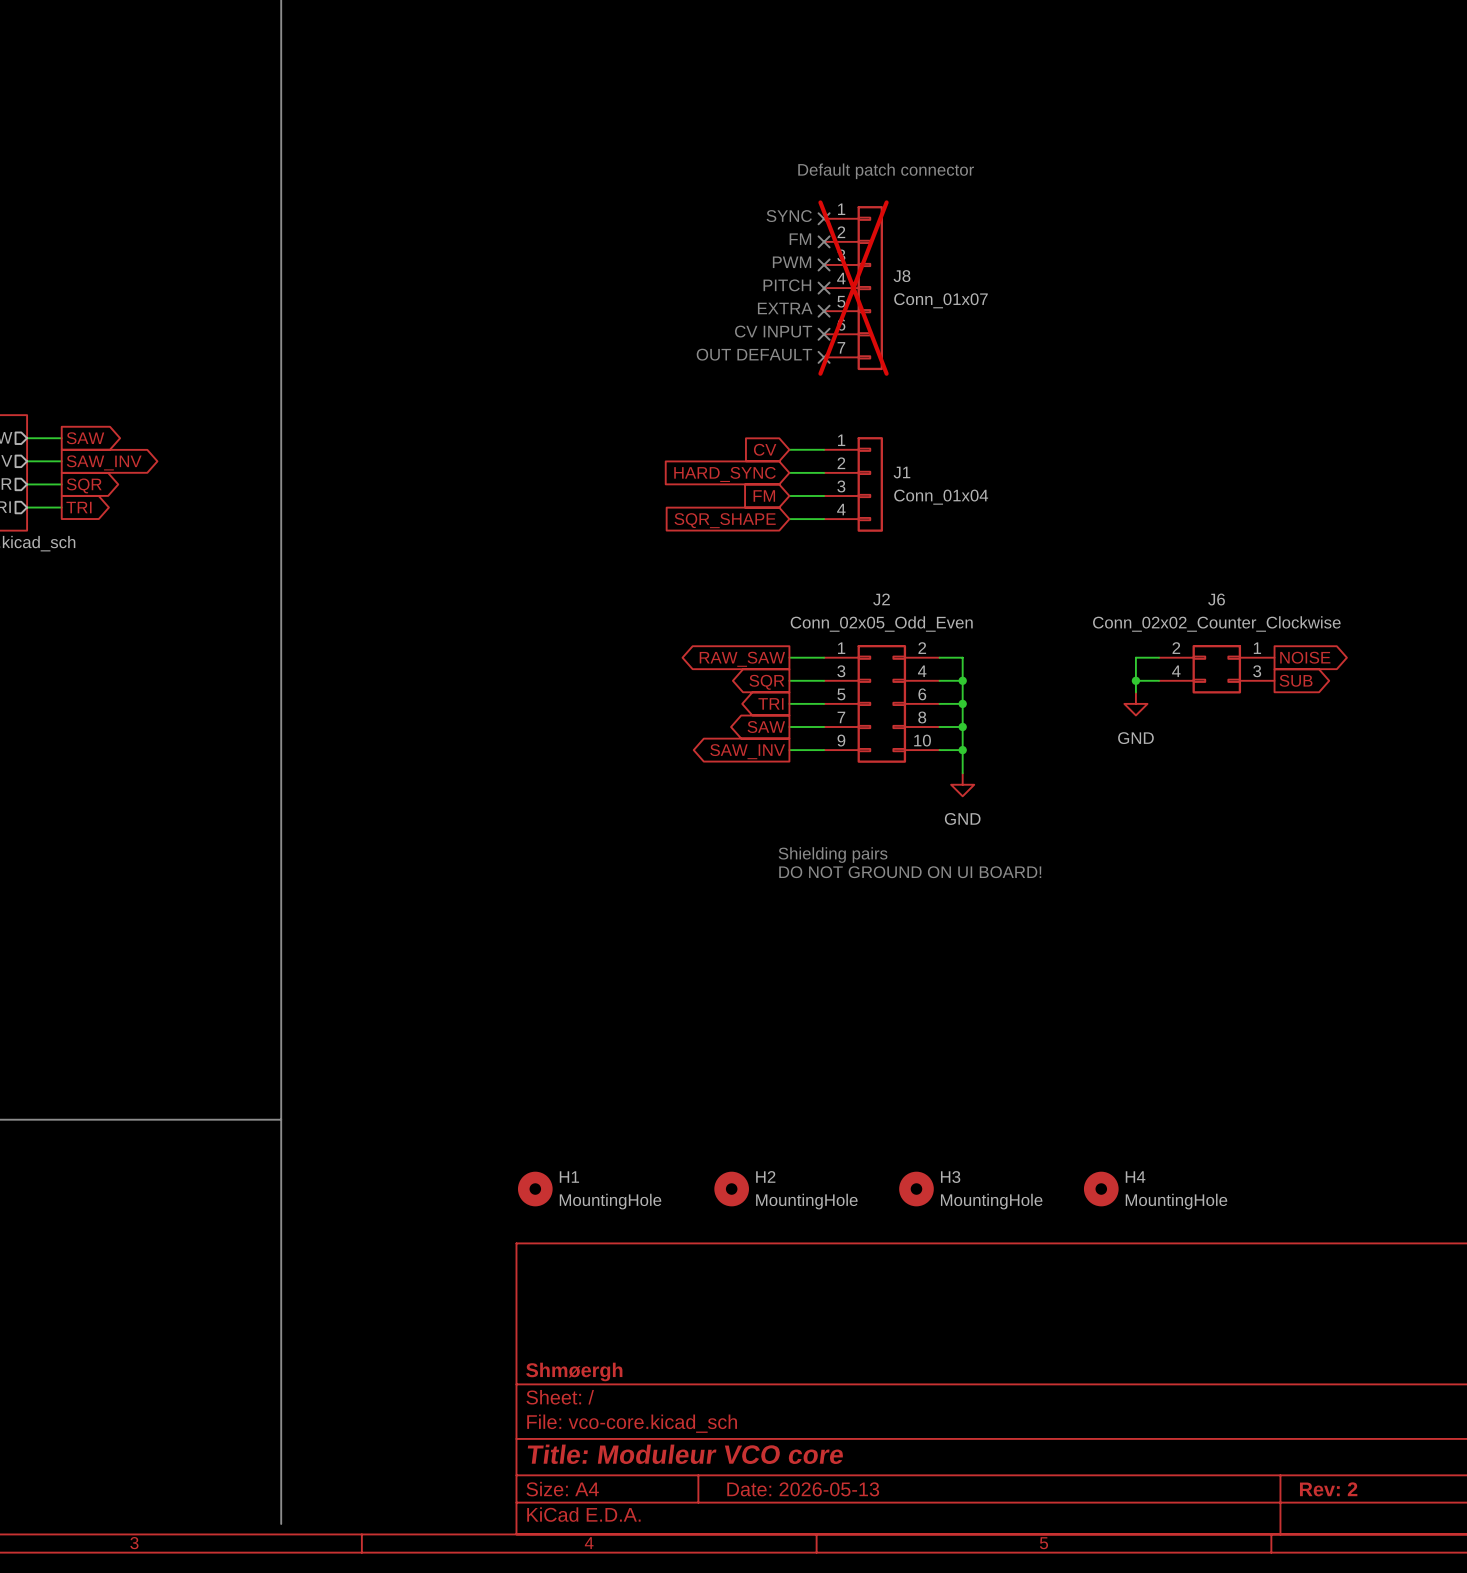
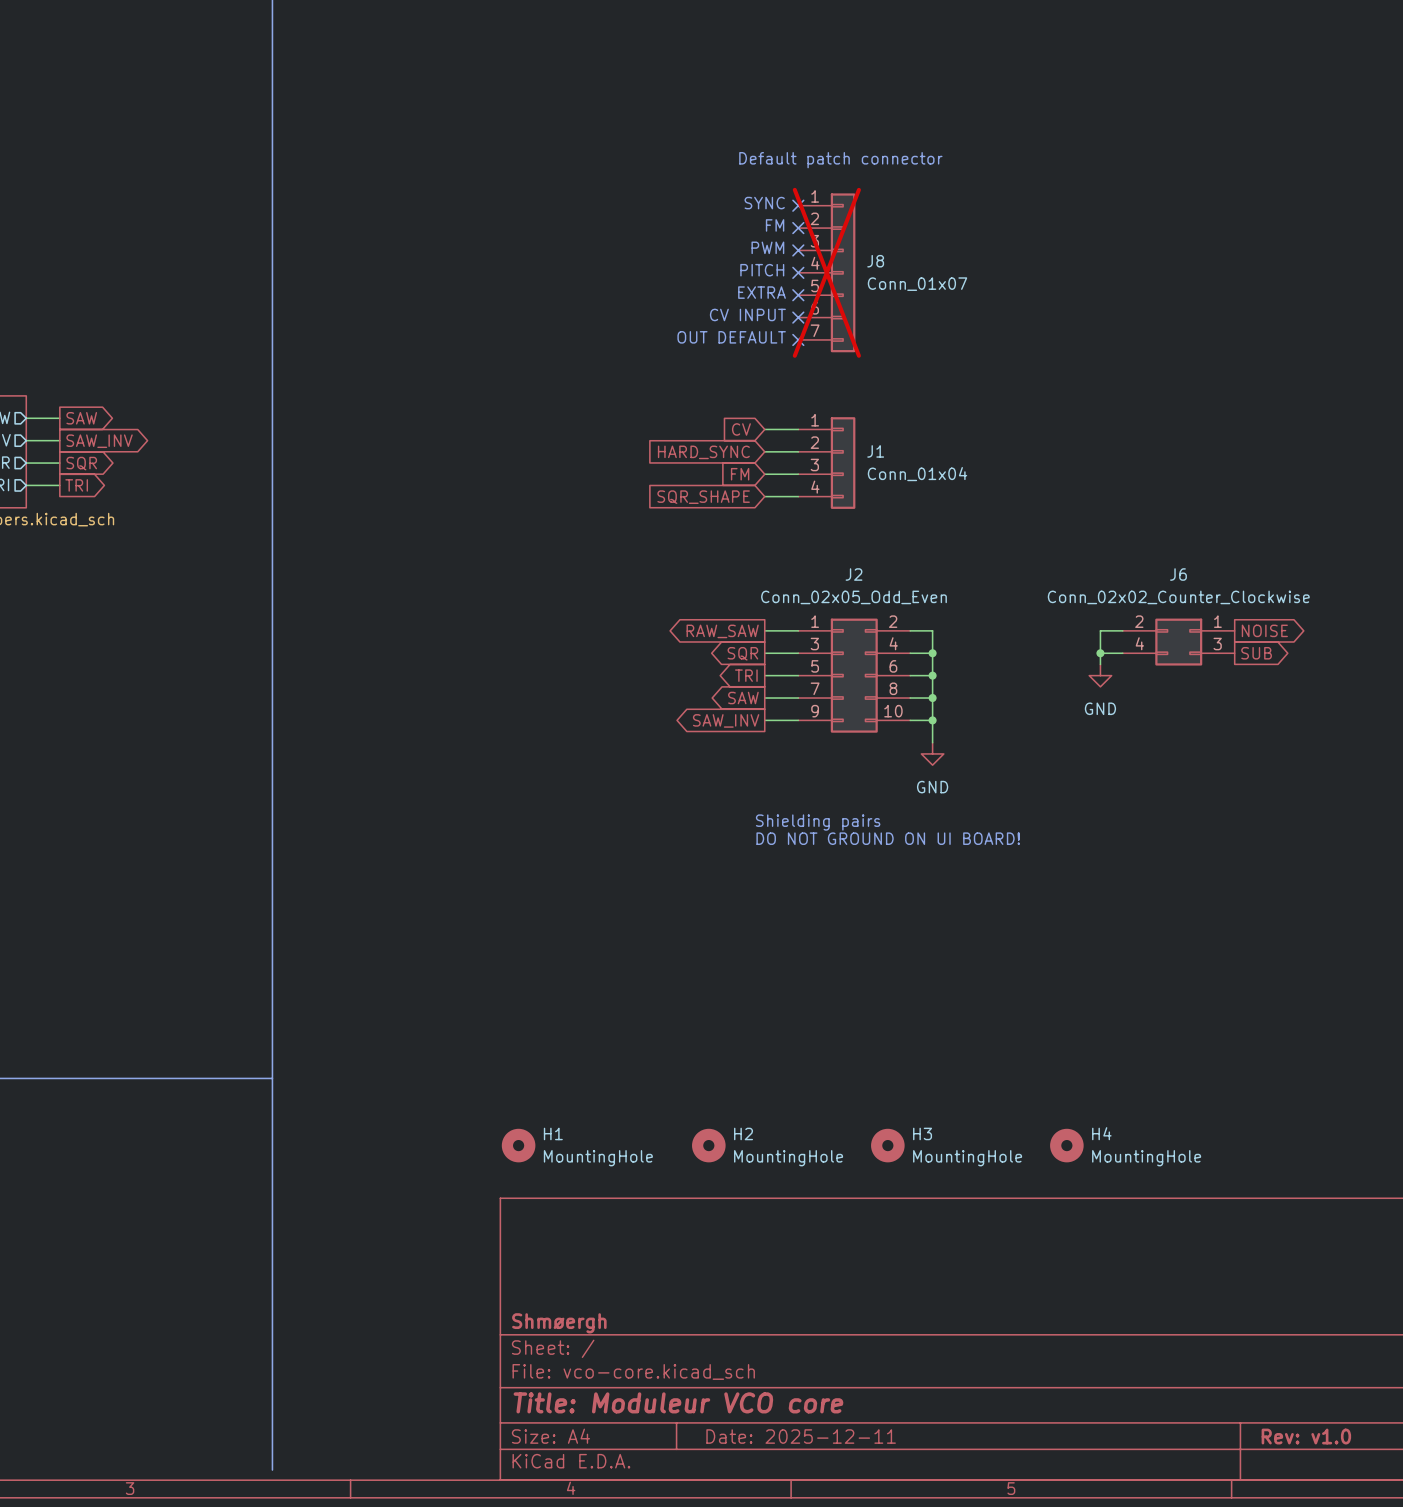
title block: Date: 2026-05-13 (803, 1489) -> Date: 2025-12-11 (801, 1436)
title block: Rev: 2 (1328, 1489) -> Rev: v1.0 (1306, 1436)

